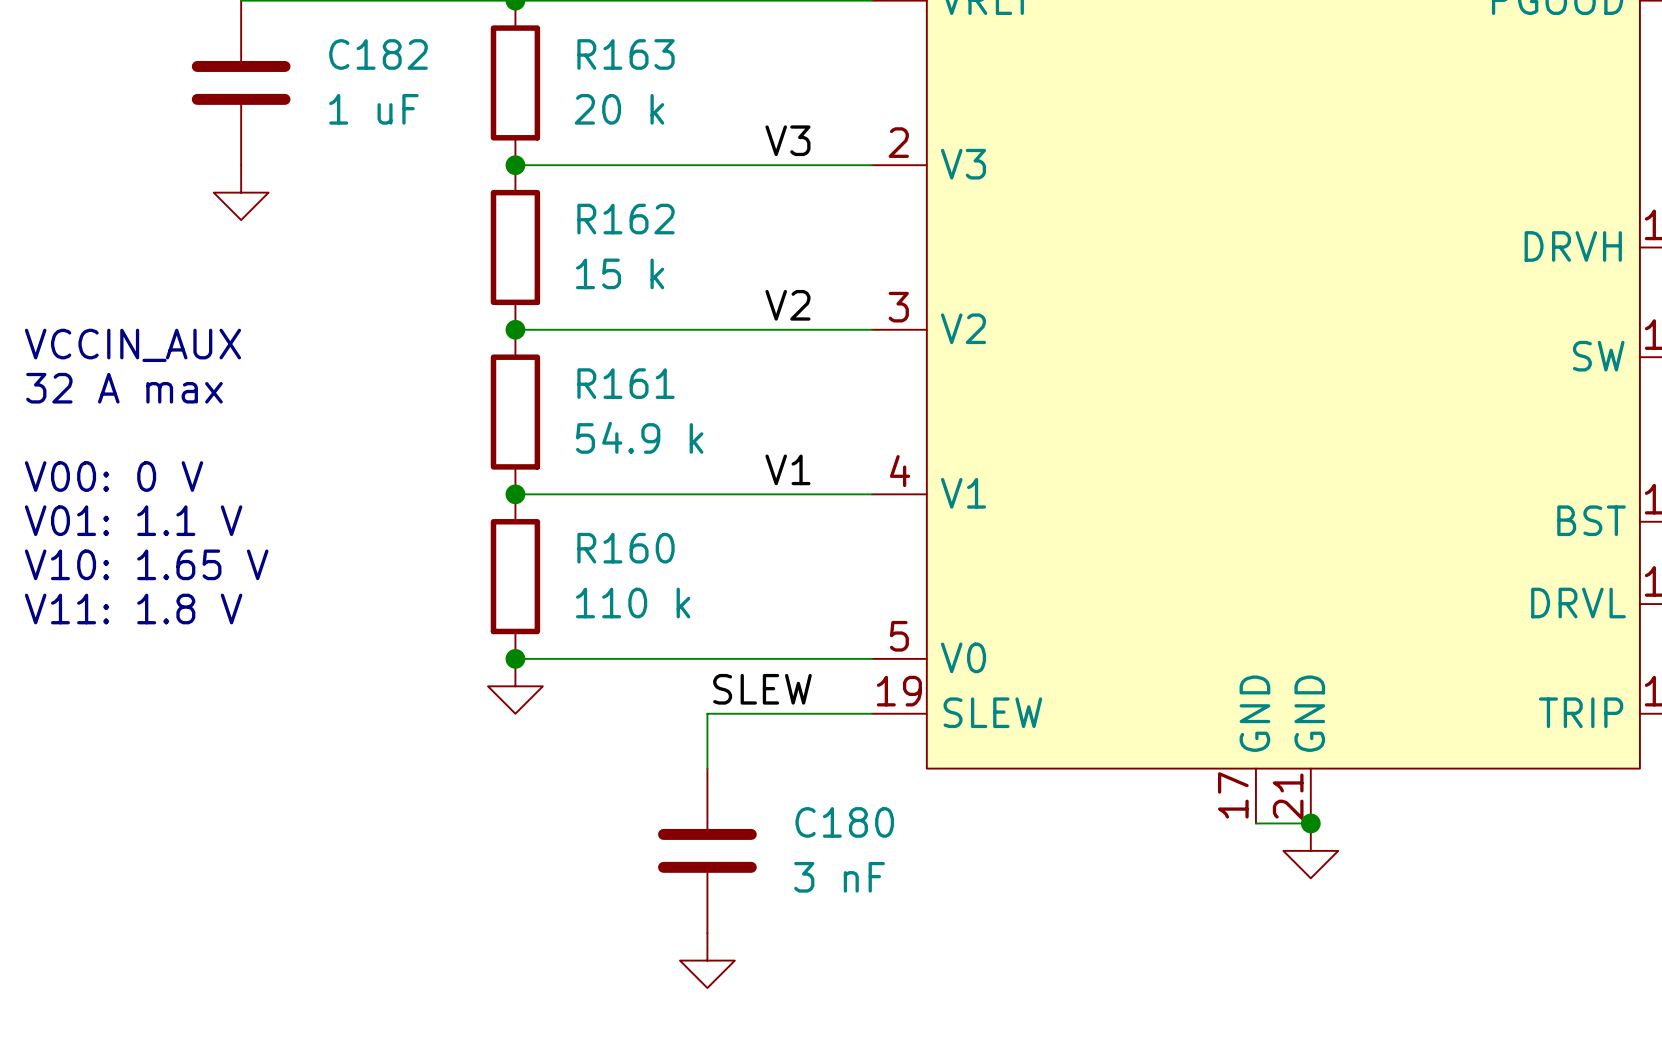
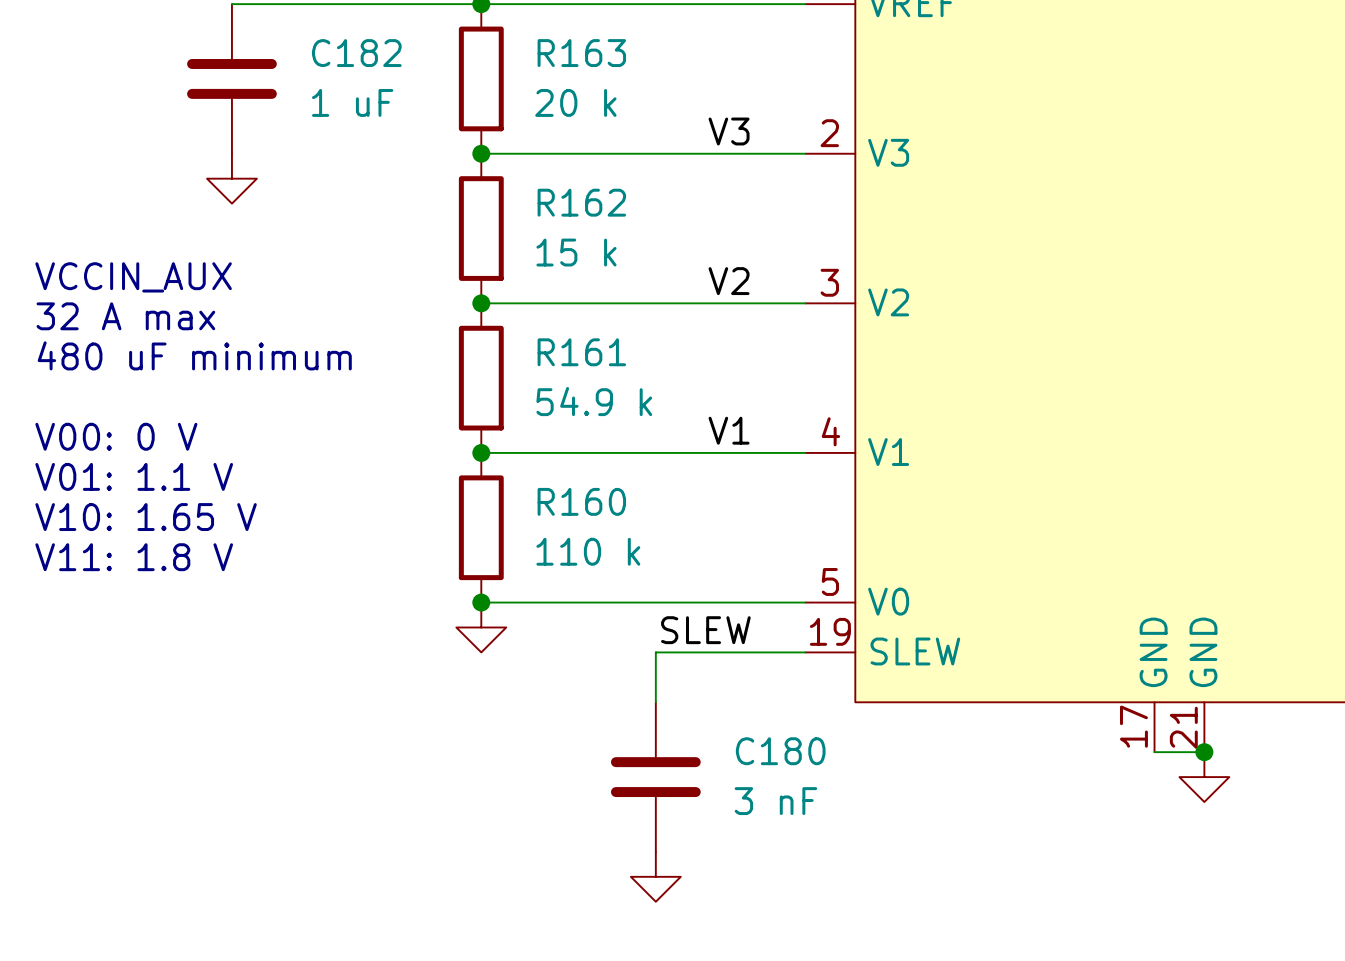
text: none -> VCCIN_AUX (133, 277)
text: VCCIN_AUX (132, 345) -> 32 A max (125, 316)
text: 32 A max (124, 388) -> 480 uF minimum (194, 355)

